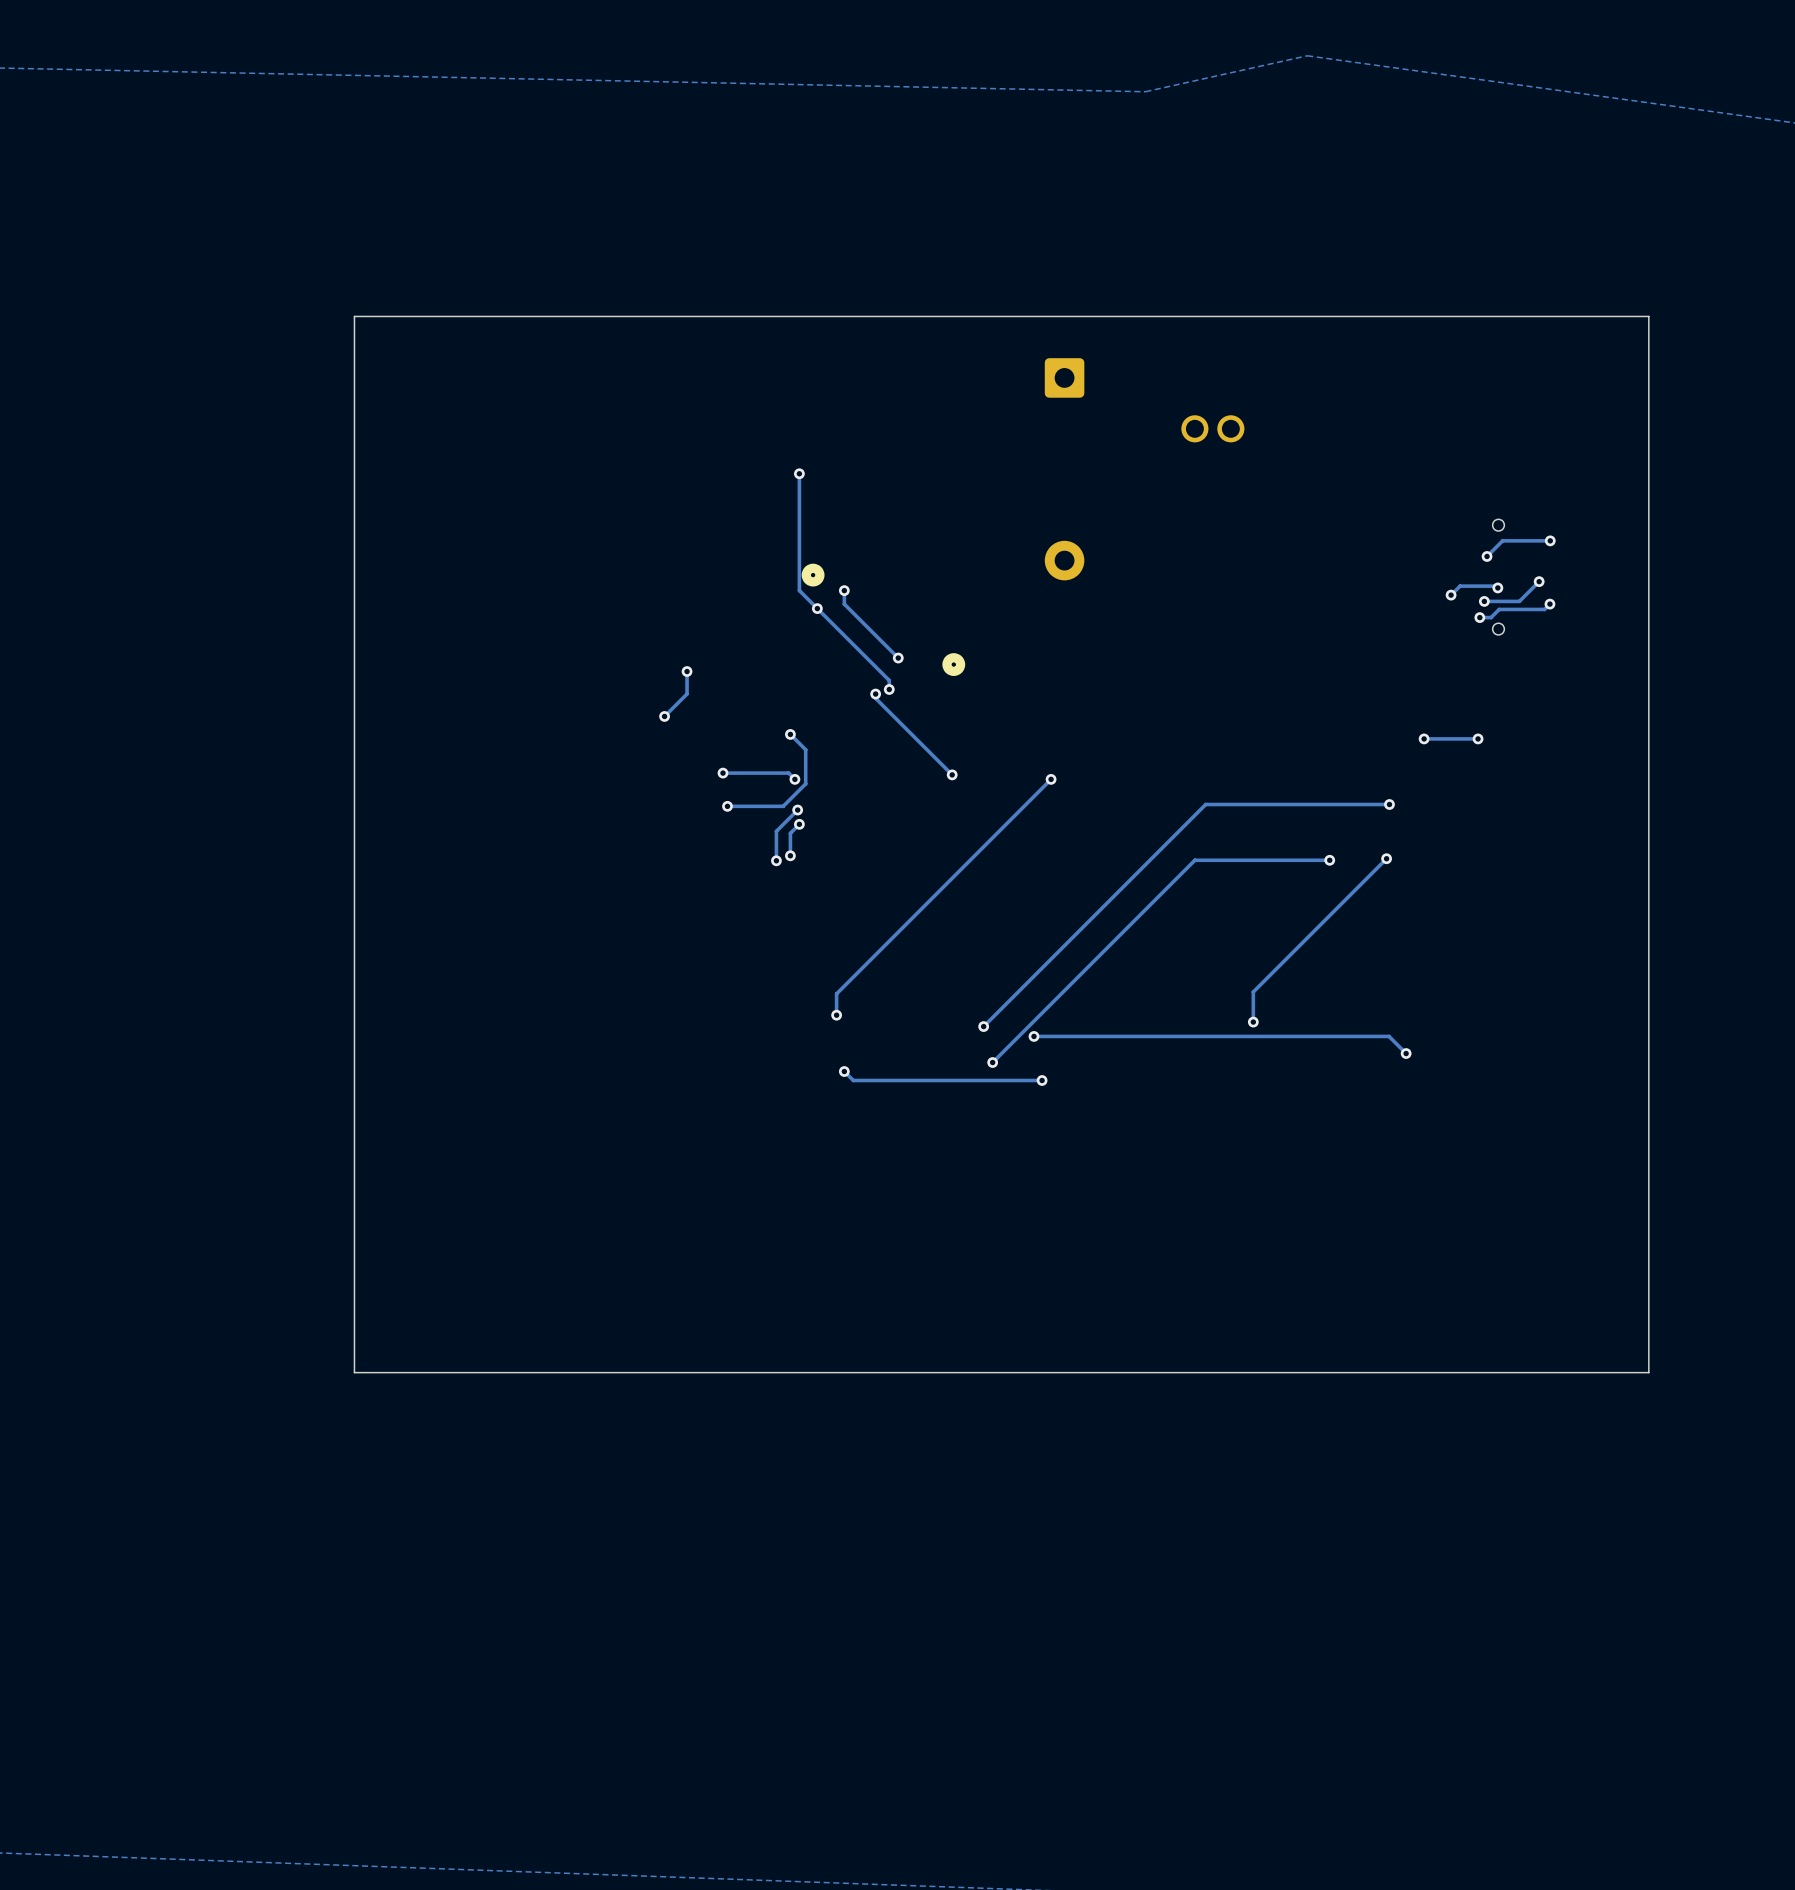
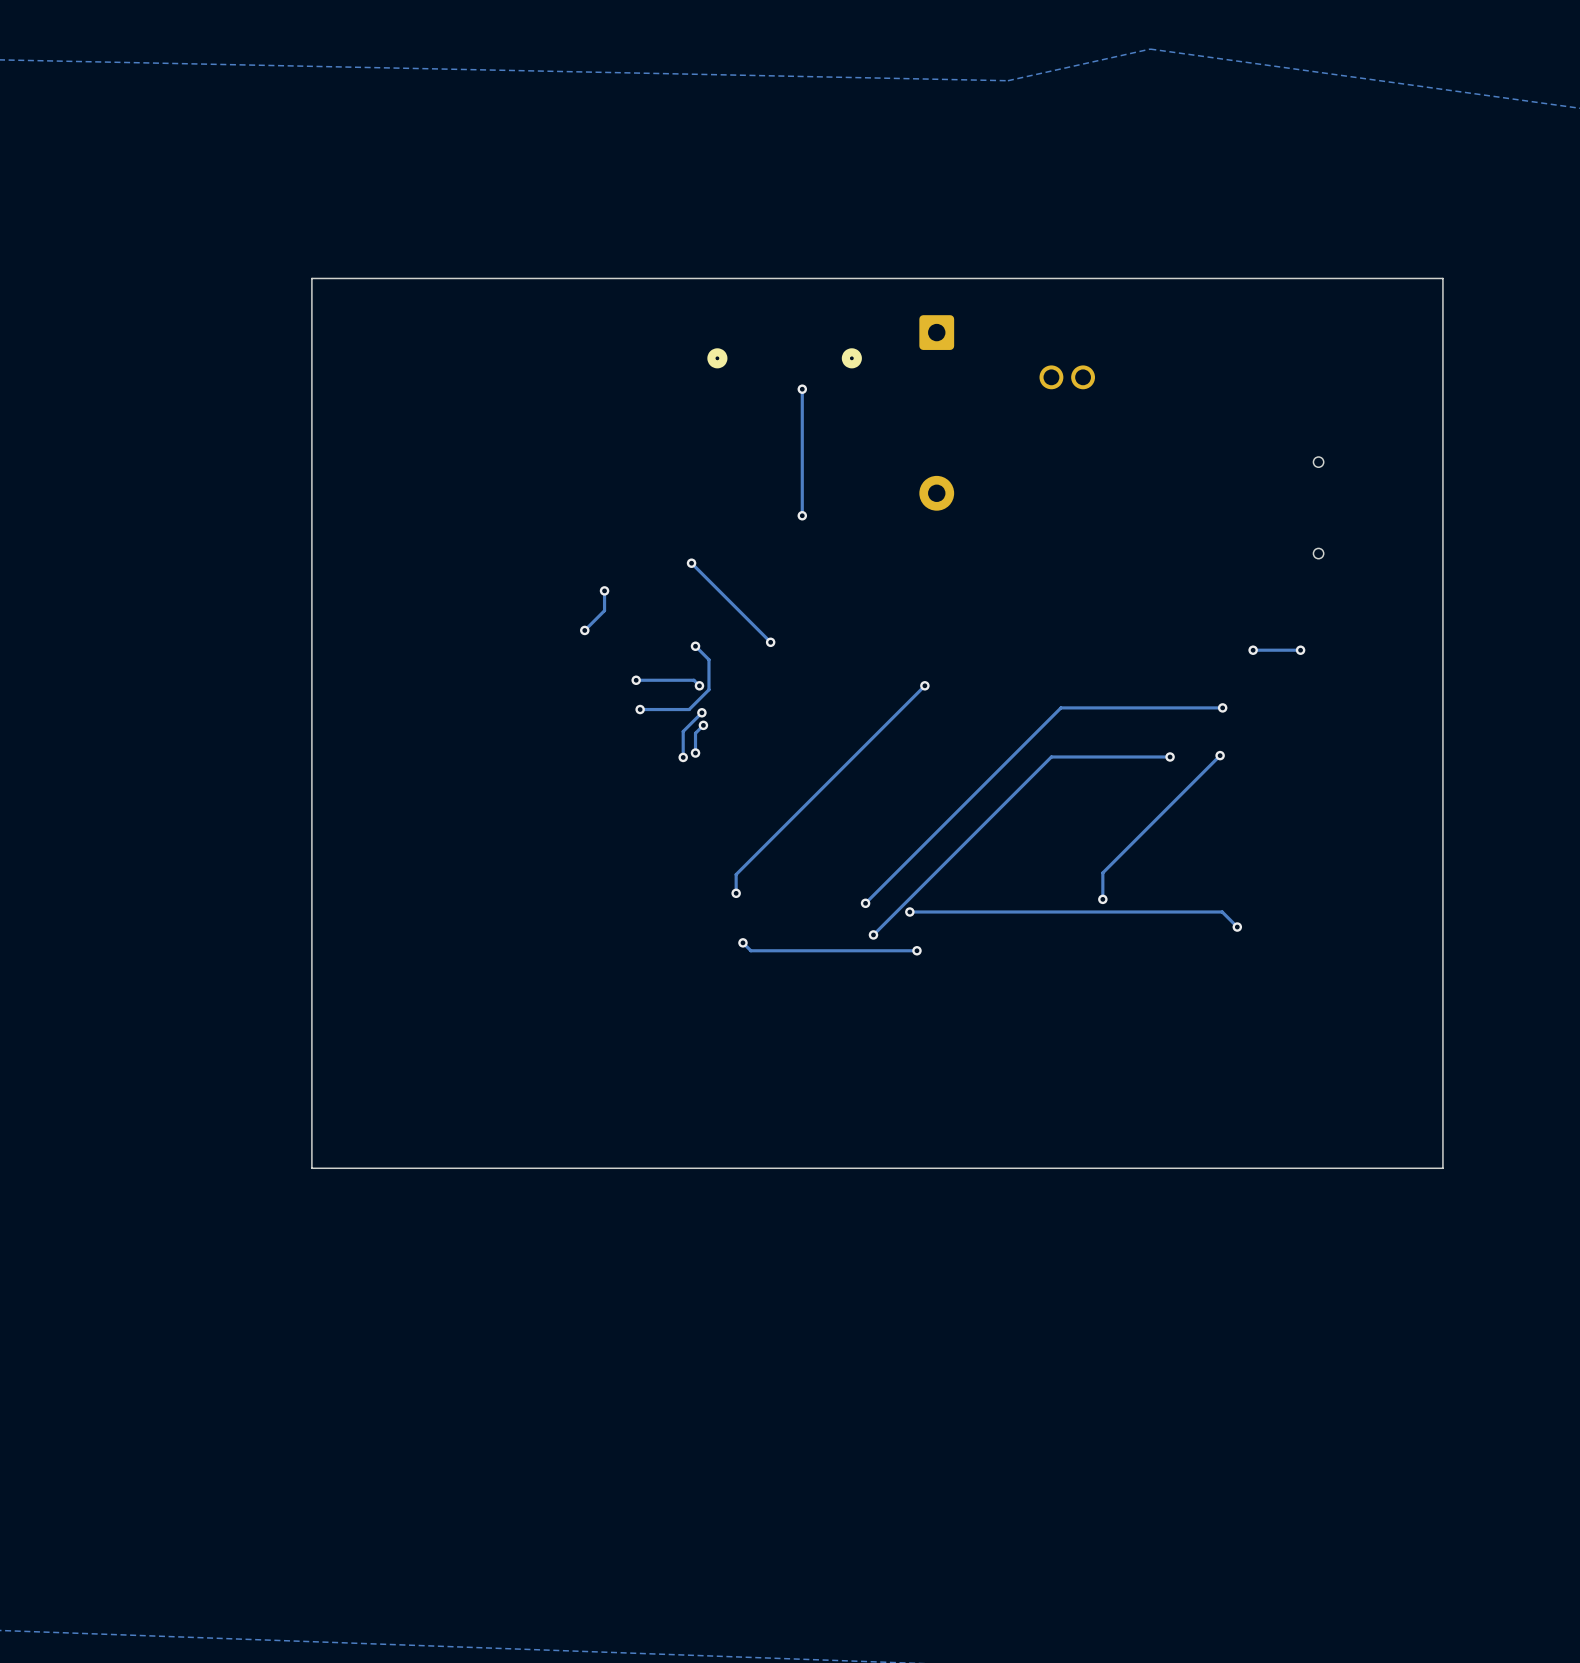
board edge: (1639, 316) (1648, 316) (1648, 1372) (354, 1372) (354, 1327) -> (1442, 278) (1442, 1168) (311, 1168)
part: none -> (717, 358)
part: none -> (851, 358)
track: none -> (802, 389) (802, 515)
via: none -> (802, 389)
track: (799, 473) (799, 590) (889, 680) (889, 689) -> none
via: (799, 473) -> none
track: (1550, 540) (1502, 540) (1487, 556) -> none
via: (1550, 540) -> none
via: (1487, 556) -> none
part: (813, 575) -> none
track: (1539, 581) (1519, 601) (1484, 601) -> none
via: (1539, 581) -> none
via: none -> (802, 515)
track: (1497, 587) (1496, 586) (1460, 586) (1451, 595) -> none
via: (1497, 587) -> none
track: (844, 590) (844, 604) (898, 658) -> none
via: (844, 590) -> none
via: (1451, 595) -> none
via: (1484, 601) -> none
track: (1549, 604) (1544, 609) (1499, 609) (1491, 617) (1479, 617) -> none
via: (1549, 604) -> none
via: (817, 608) -> none
via: (1479, 617) -> none
track: none -> (691, 563) (770, 642)
via: none -> (691, 563)
via: (898, 658) -> none
part: (953, 664) -> none
via: (889, 689) -> none
track: (875, 694) (875, 698) (952, 774) -> none
via: (875, 694) -> none
via: none -> (770, 642)
via: (952, 774) -> none

